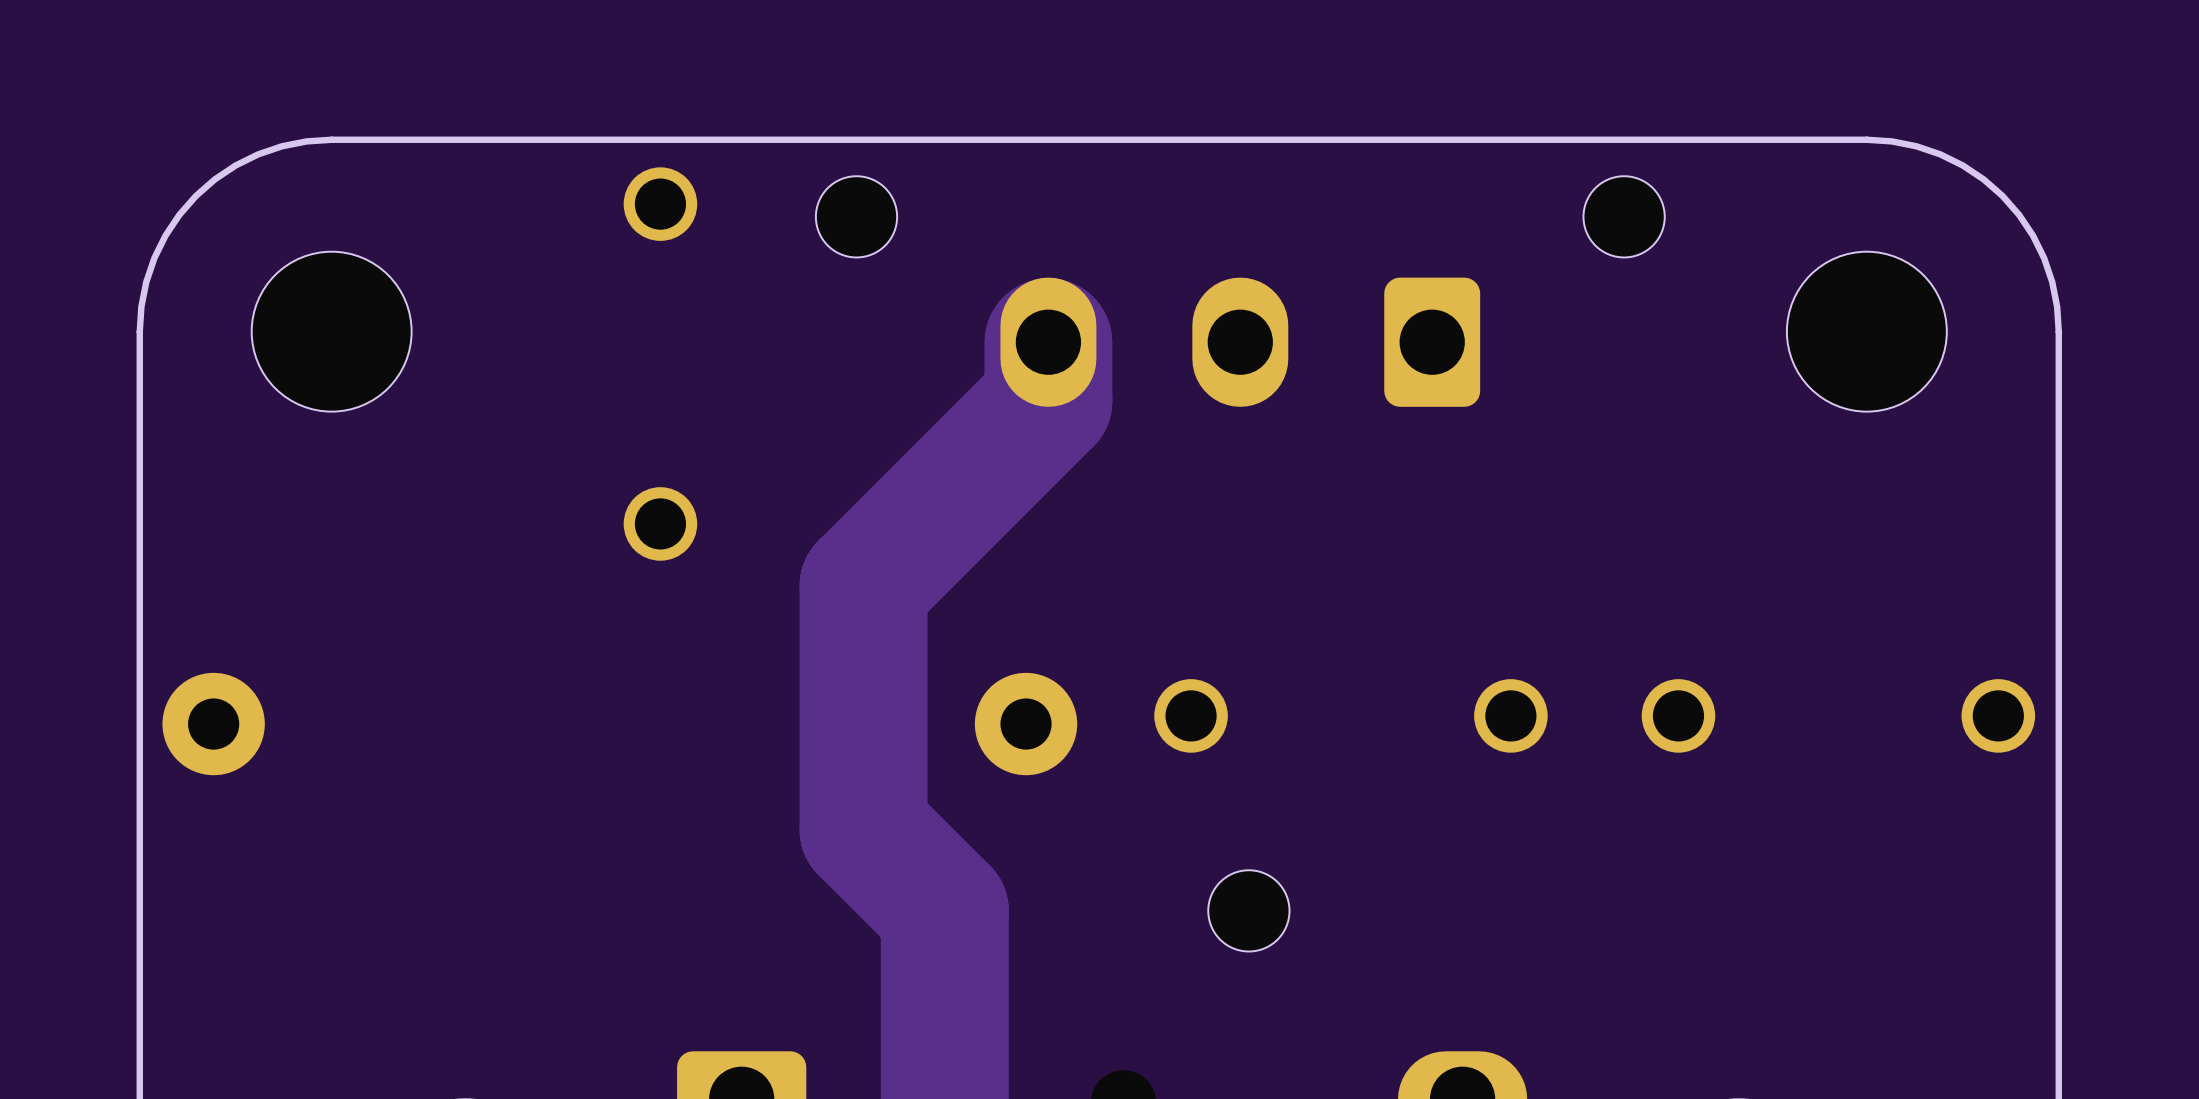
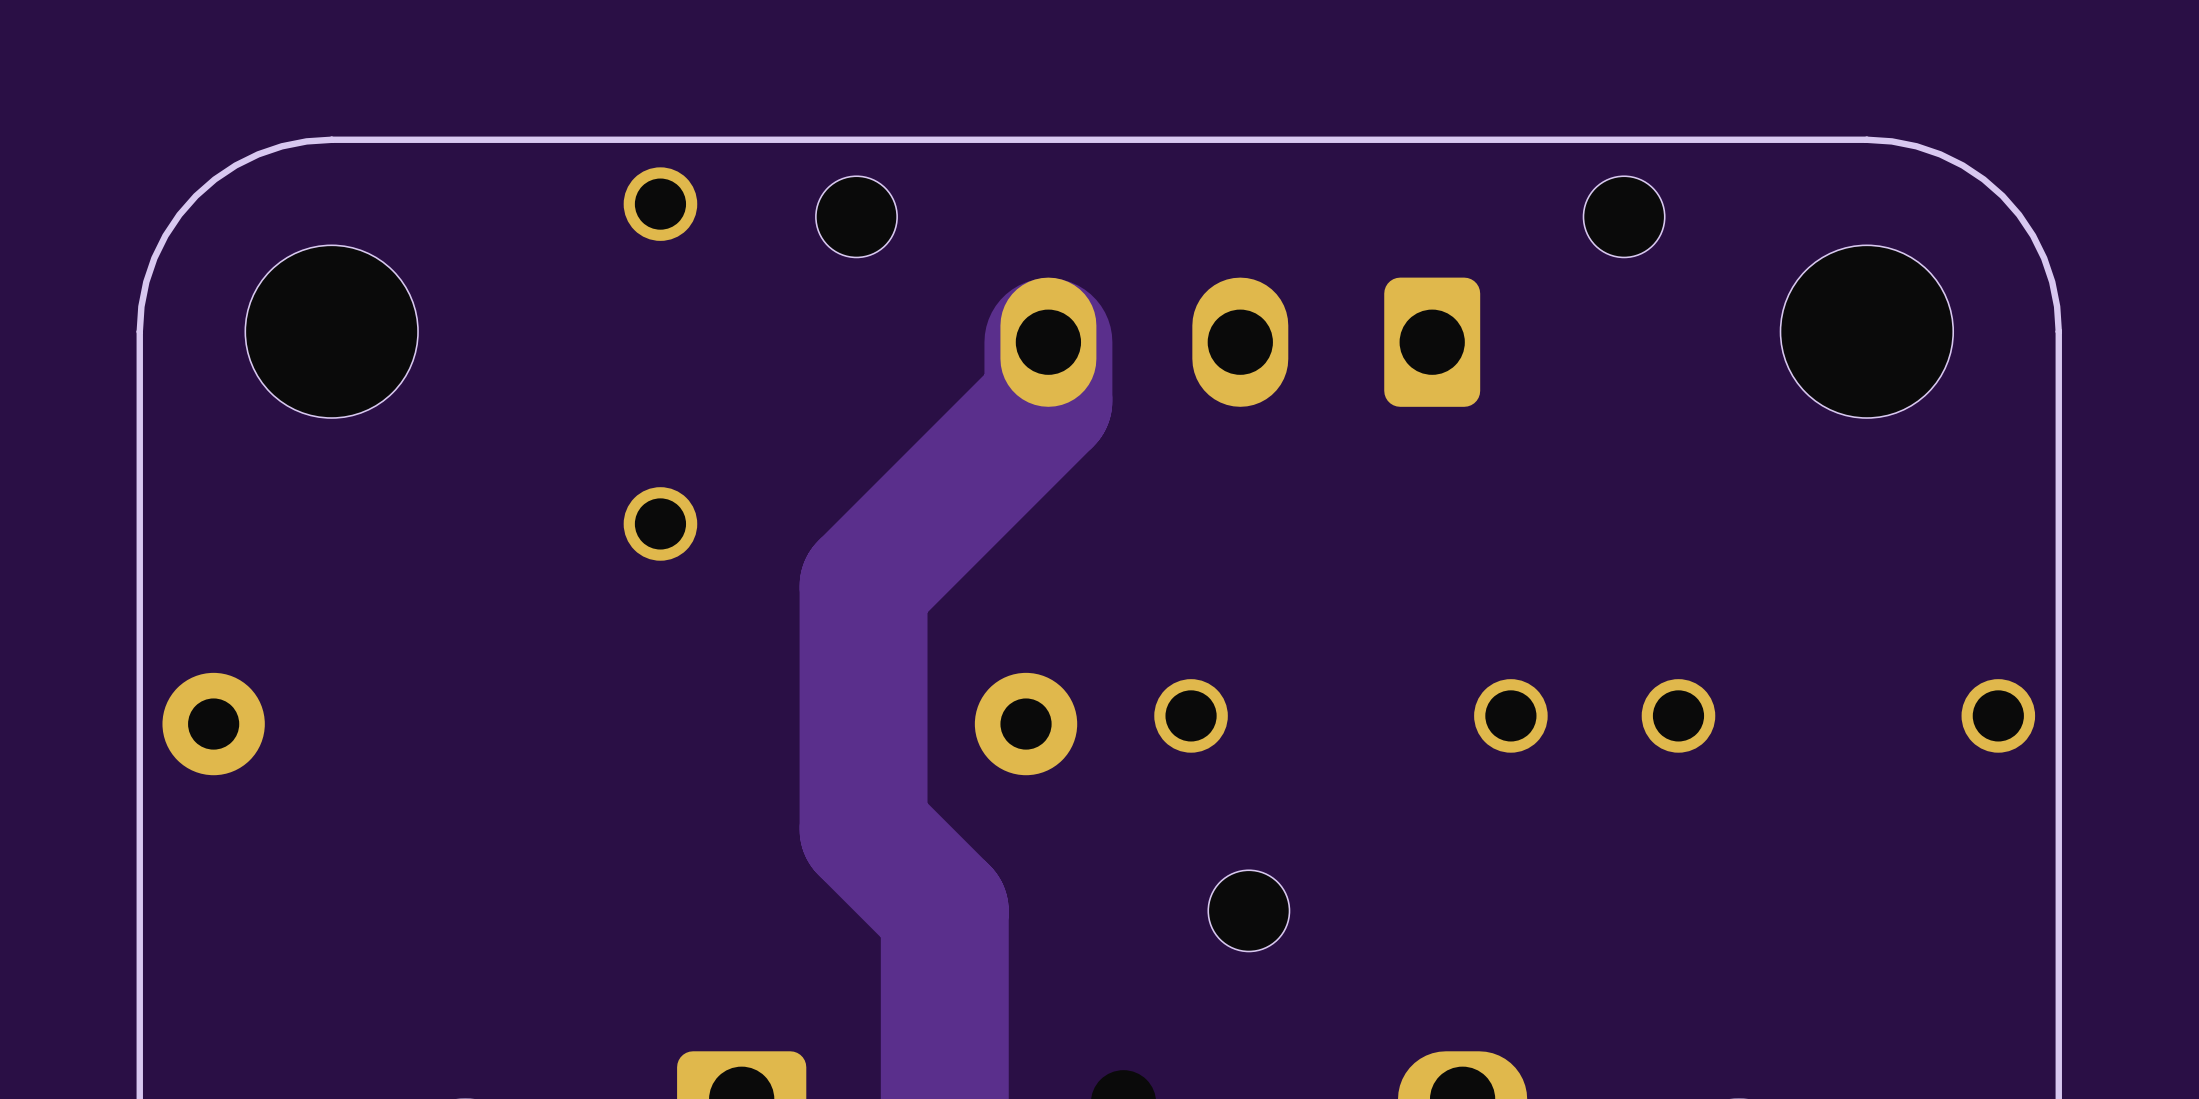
part footprint: [251, 251, 412, 412] -> [245, 245, 419, 419]
part footprint: [1786, 251, 1947, 412] -> [1780, 245, 1954, 419]

